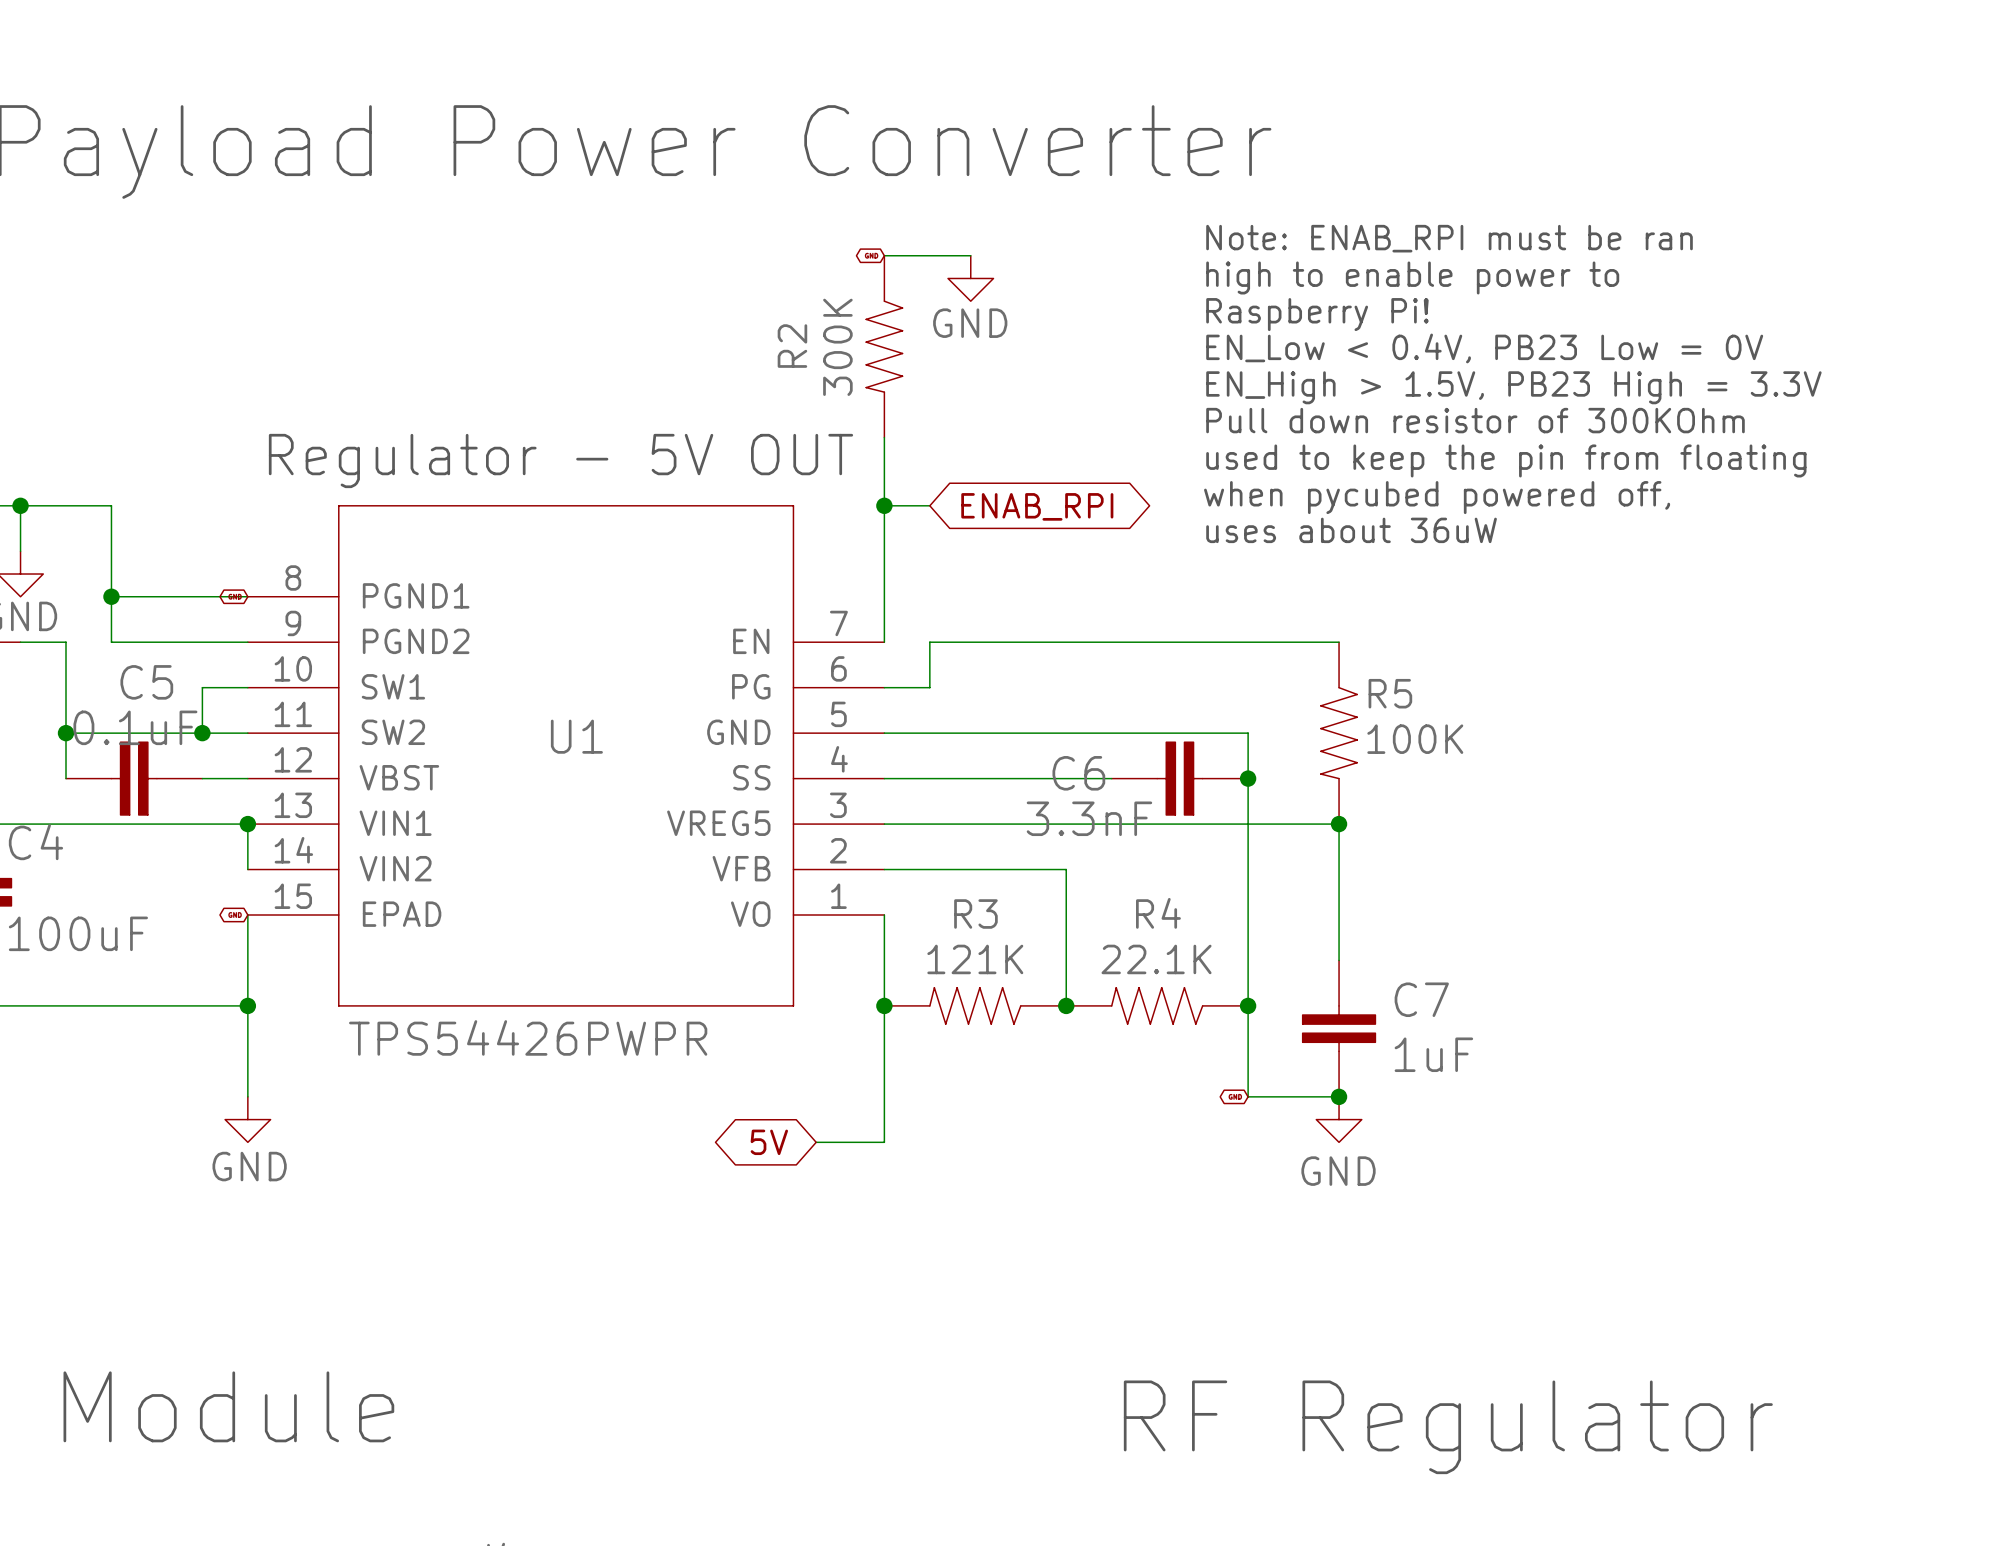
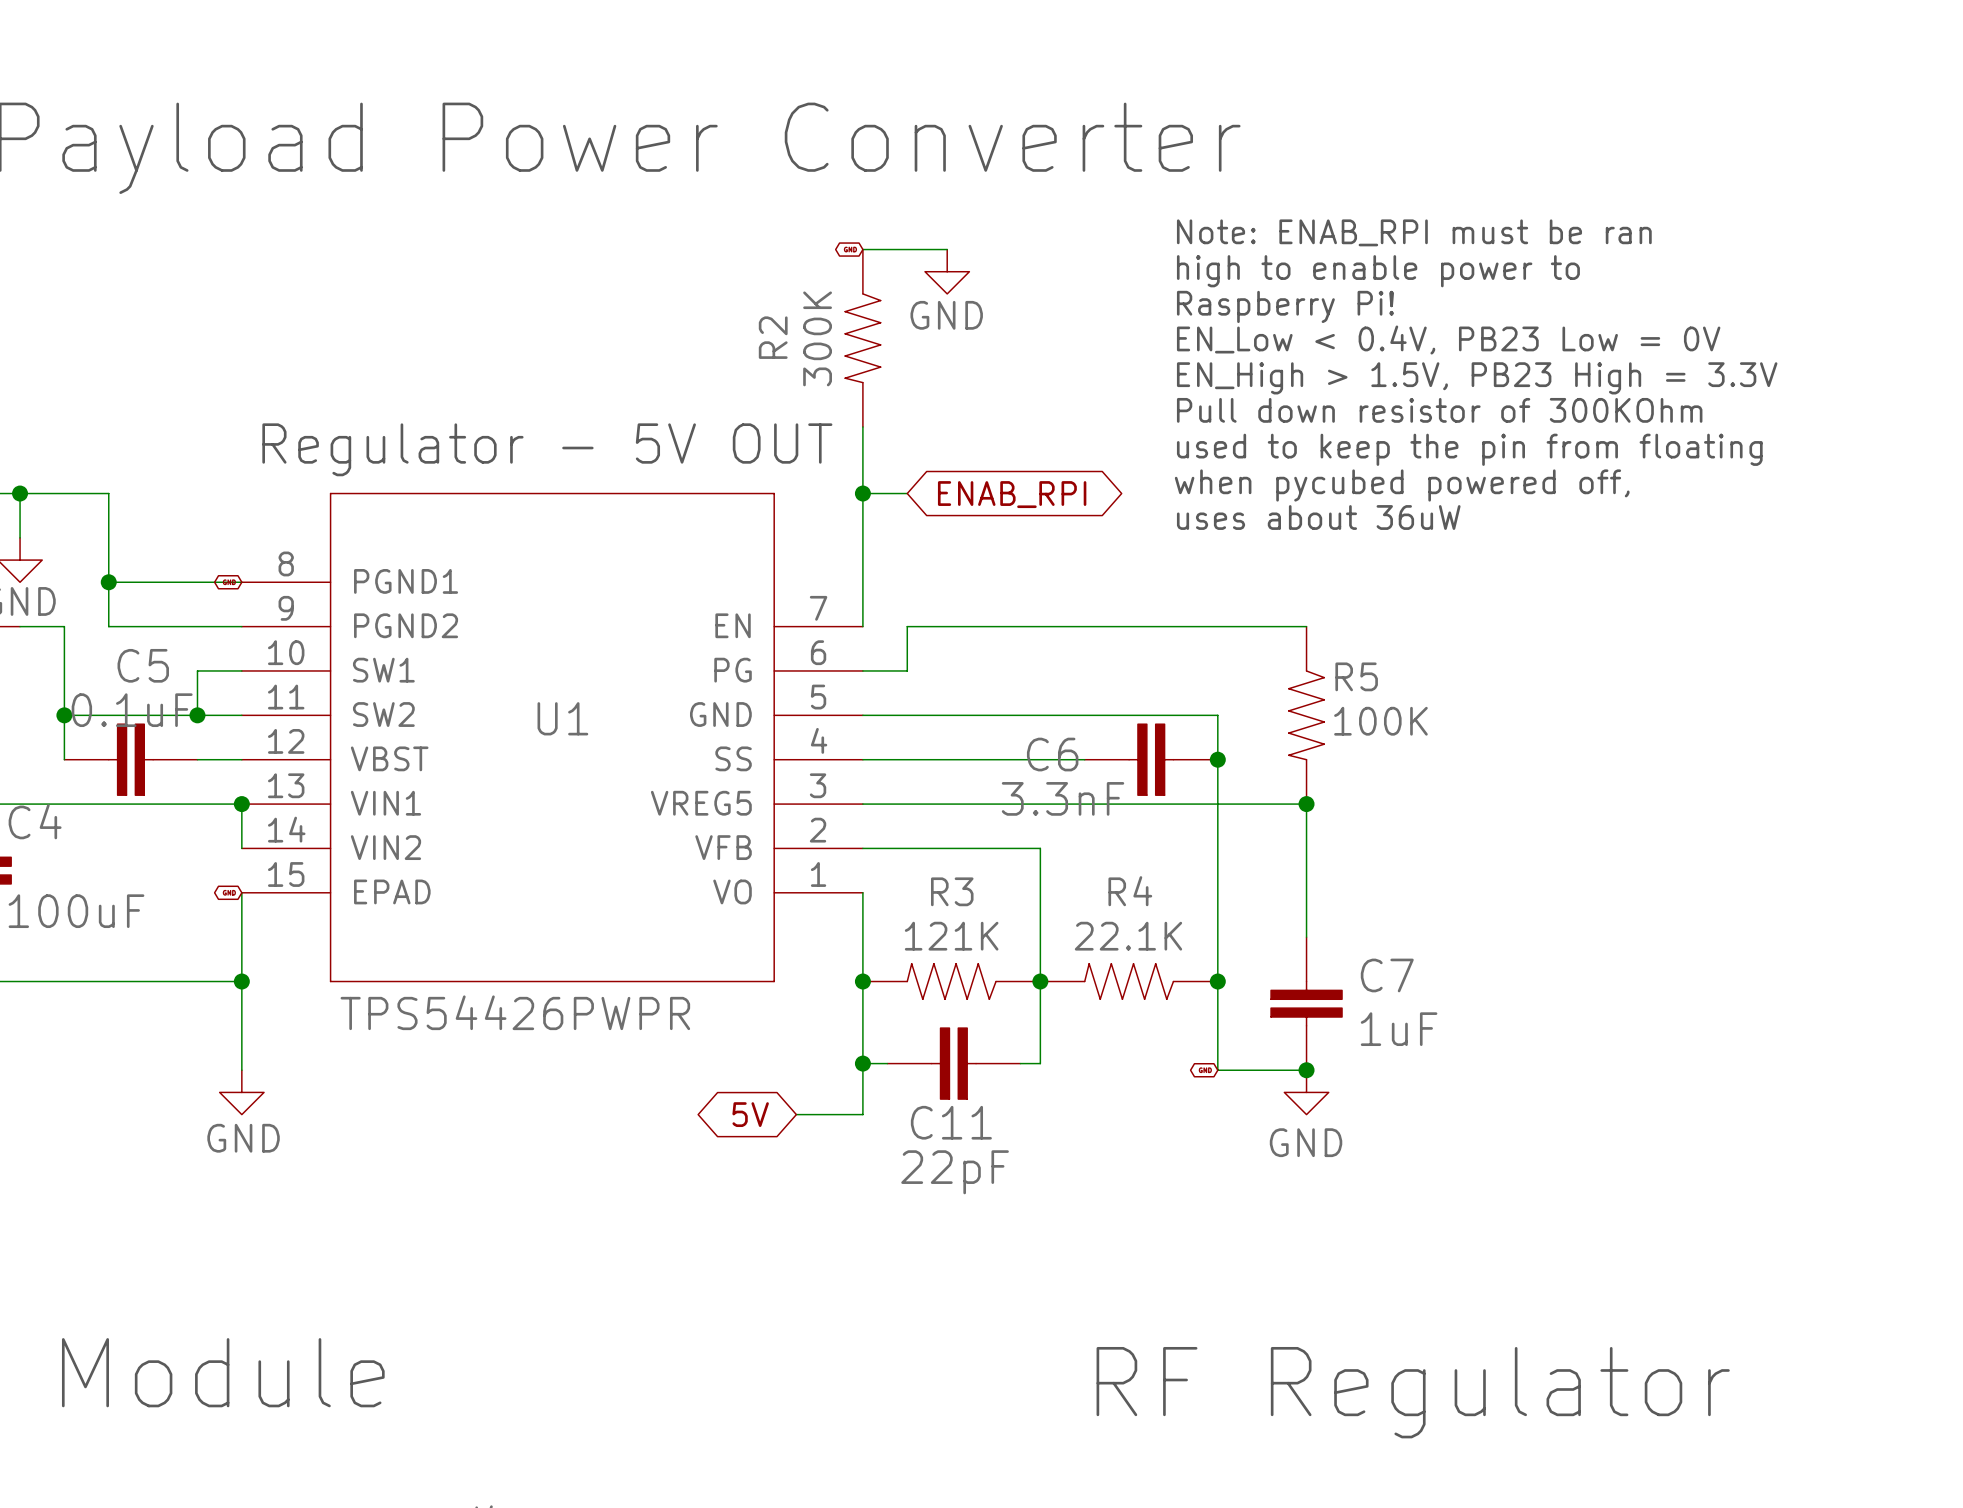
wire: none -> (1040, 981) (1040, 1063) (1020, 1063)
wire: none -> (862, 1063) (887, 1063)
junction: none -> (862, 1063)
C11: none -> 22pF (953, 1063)

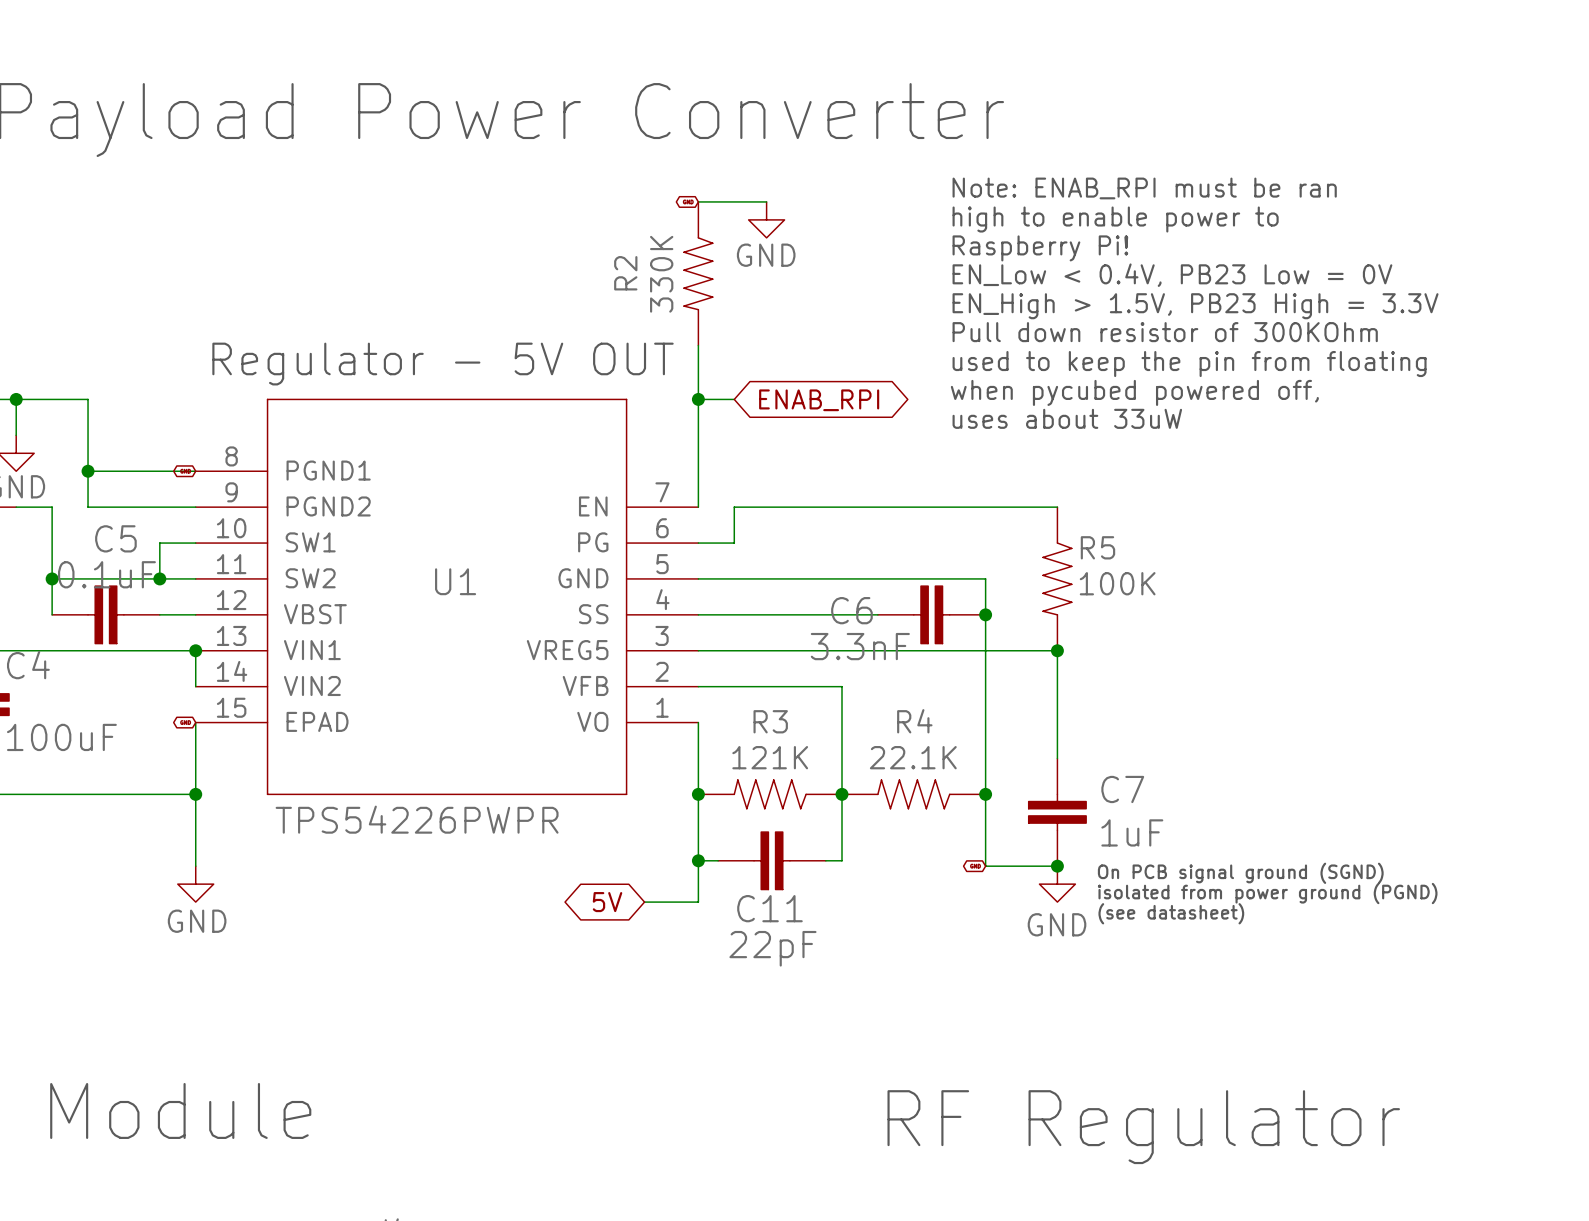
R2 value: 300K (817, 338) -> 330K (661, 274)
text: uses about 36uW (1318, 517) -> uses about 33uW (1067, 418)
U1 value: TPS54426PWPR (515, 1012) -> TPS54226PWPR (417, 819)
text: none -> On PCB signal ground (SGND) (1240, 873)
text: none -> isolated from power ground (PGND) (1267, 893)
text: none -> (see datasheet) (1171, 913)

